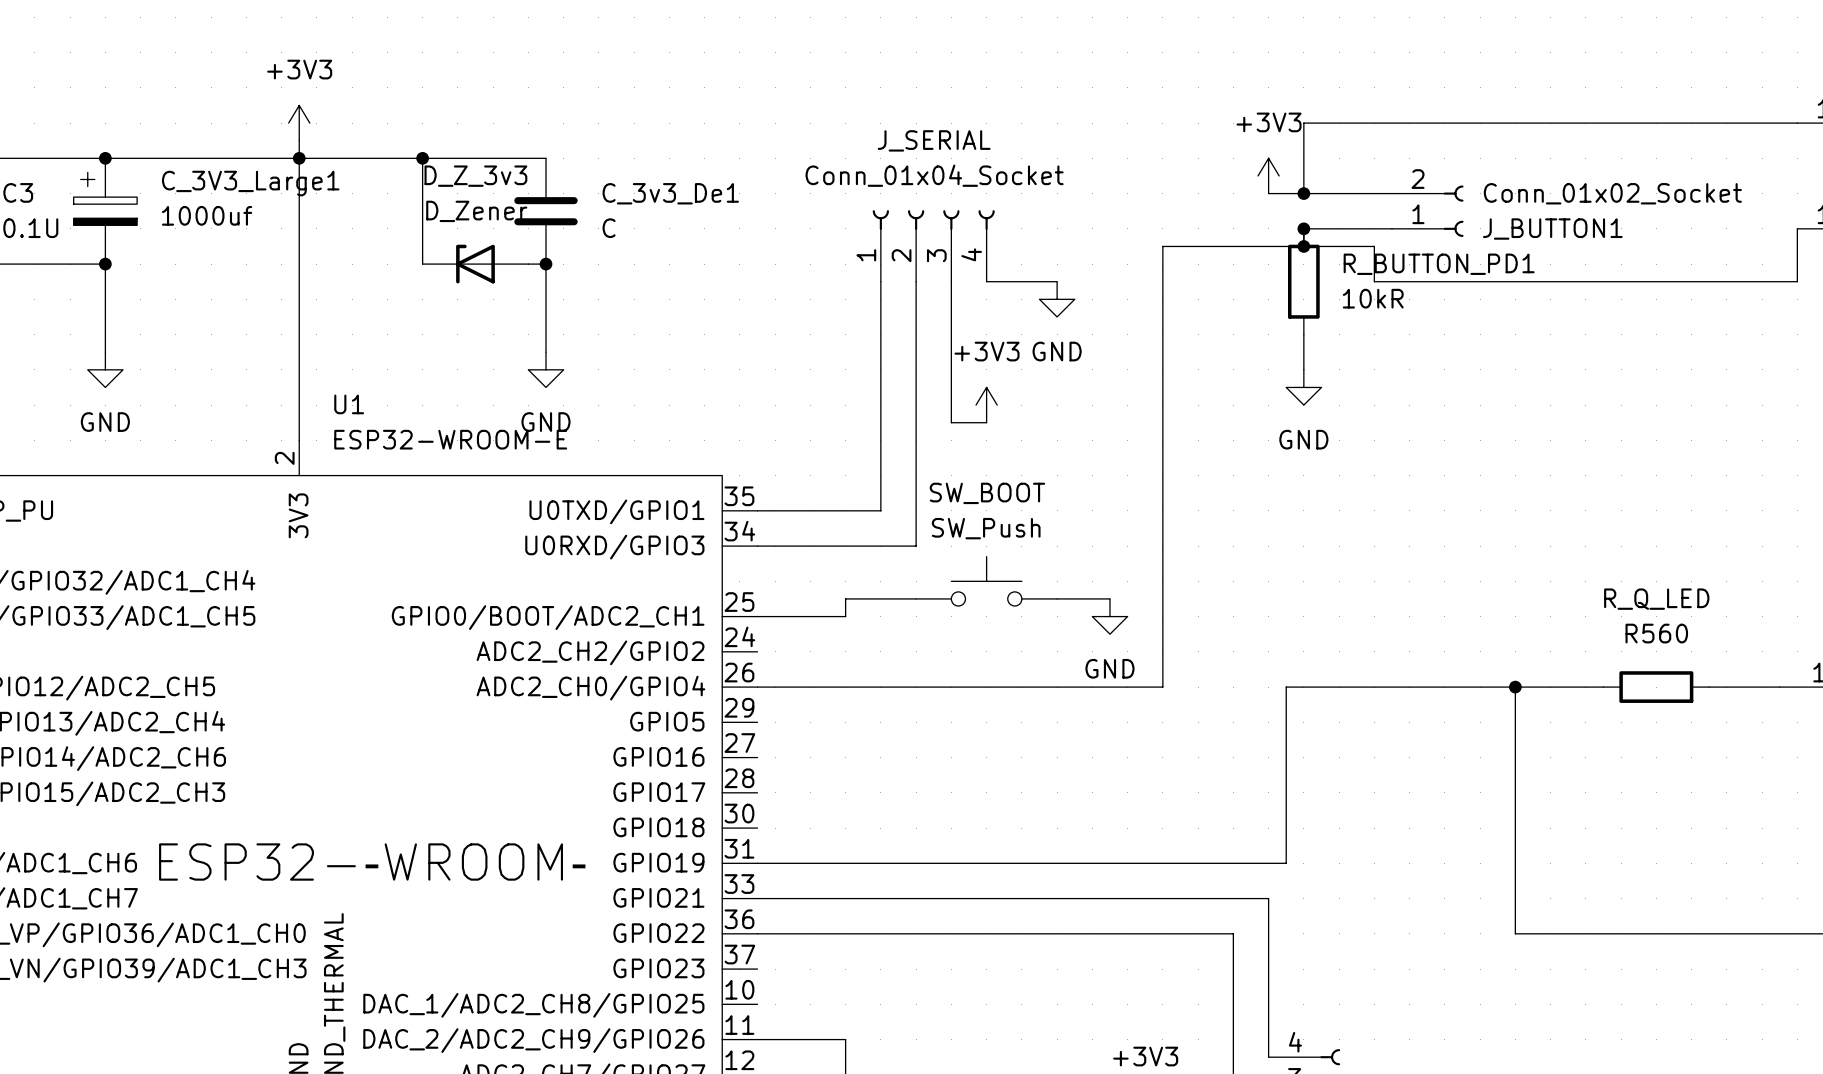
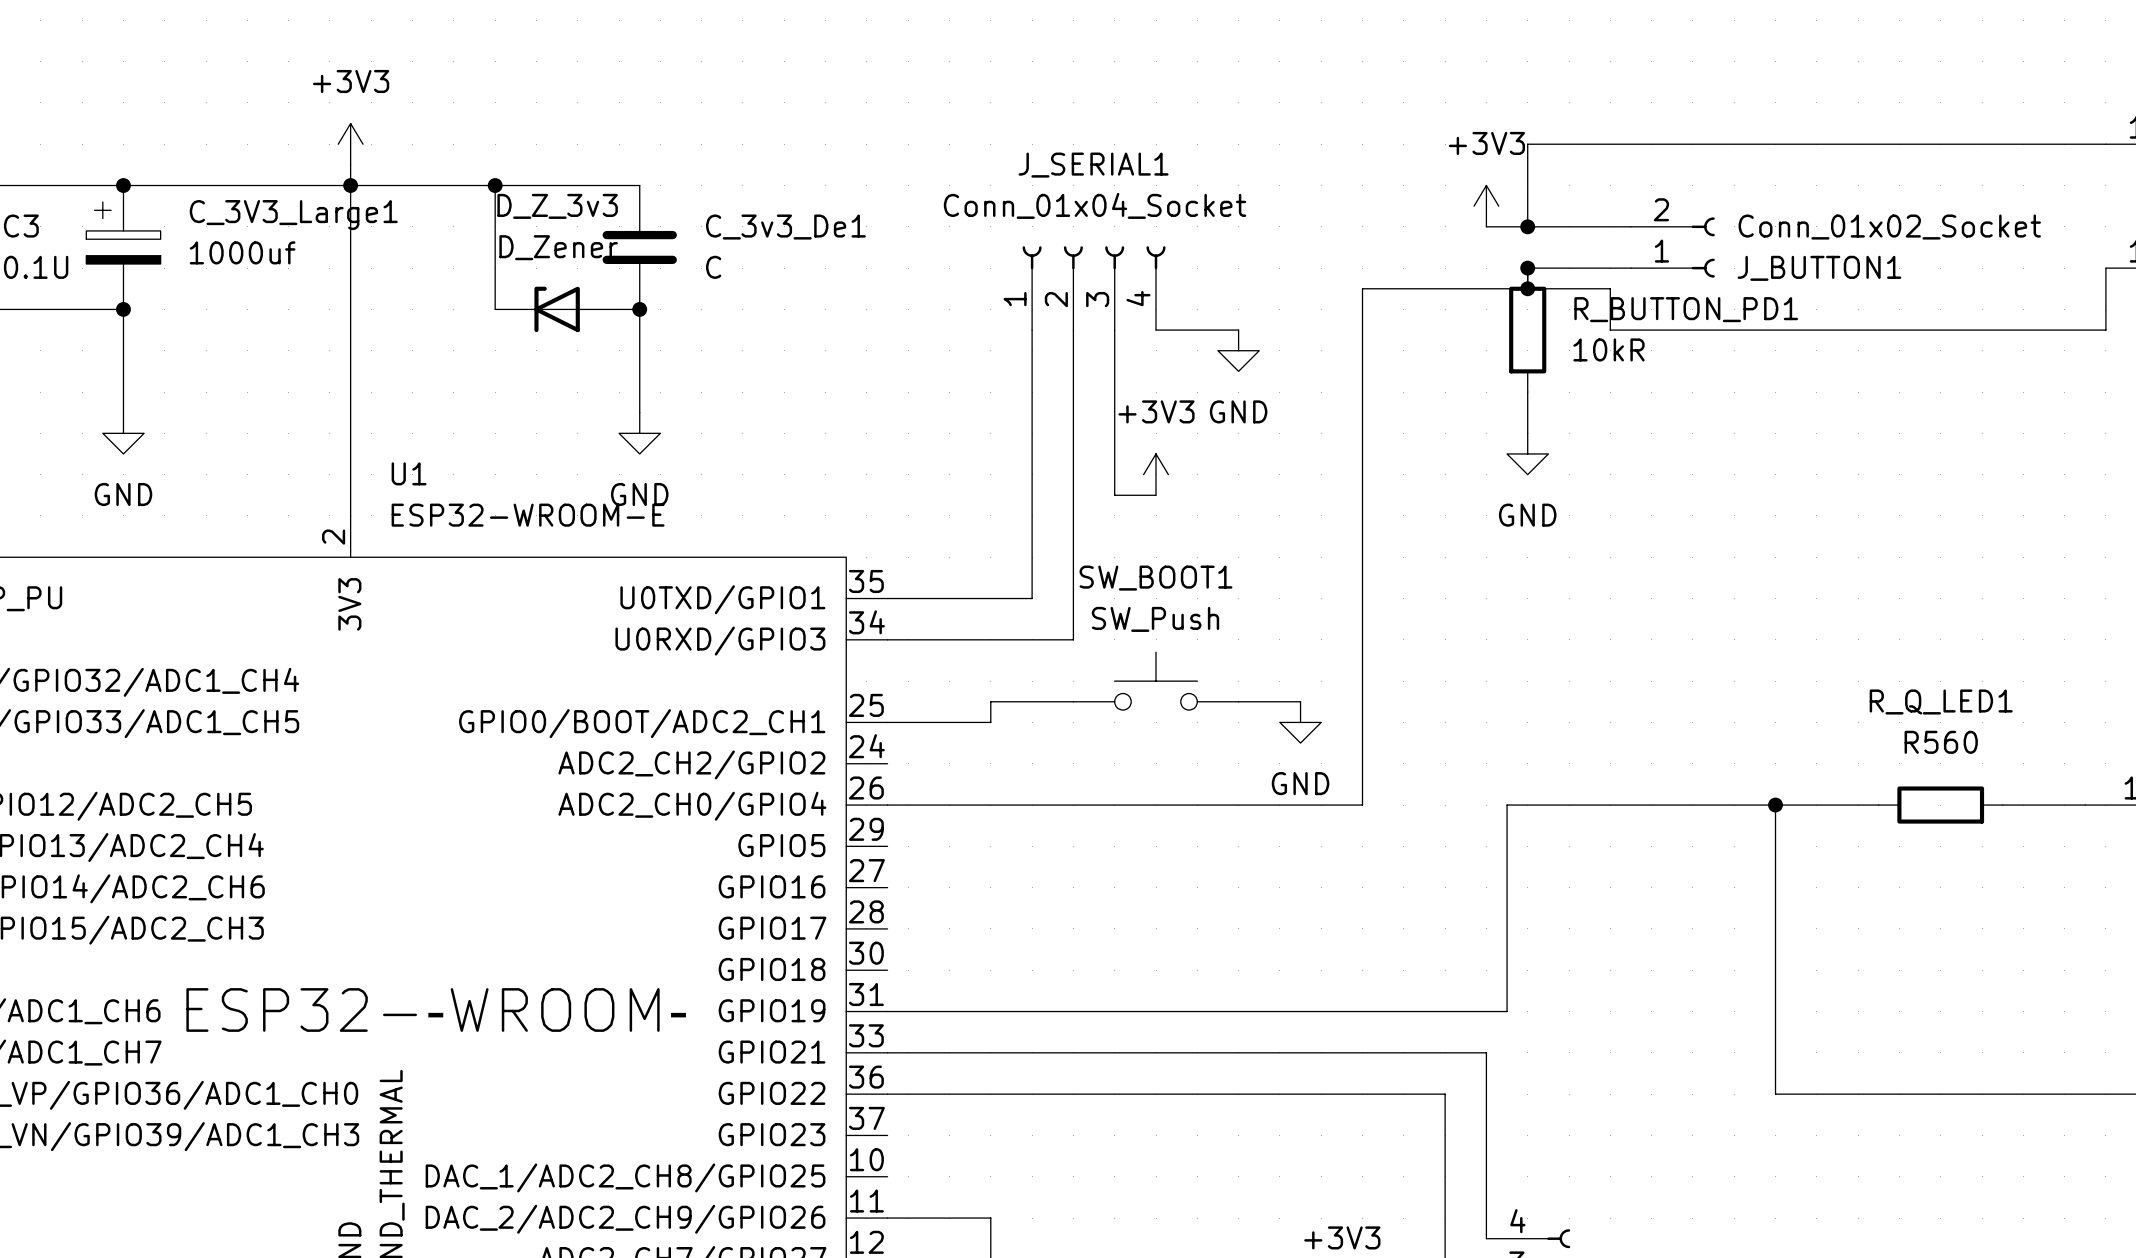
J_SERIAL name: J_SERIAL (934, 140) -> J_SERIAL1 (1093, 165)
SW_BOOT name: SW_BOOT (987, 493) -> SW_BOOT1 (1156, 578)
R_Q_LED name: R_Q_LED (1656, 599) -> R_Q_LED1 (1941, 701)

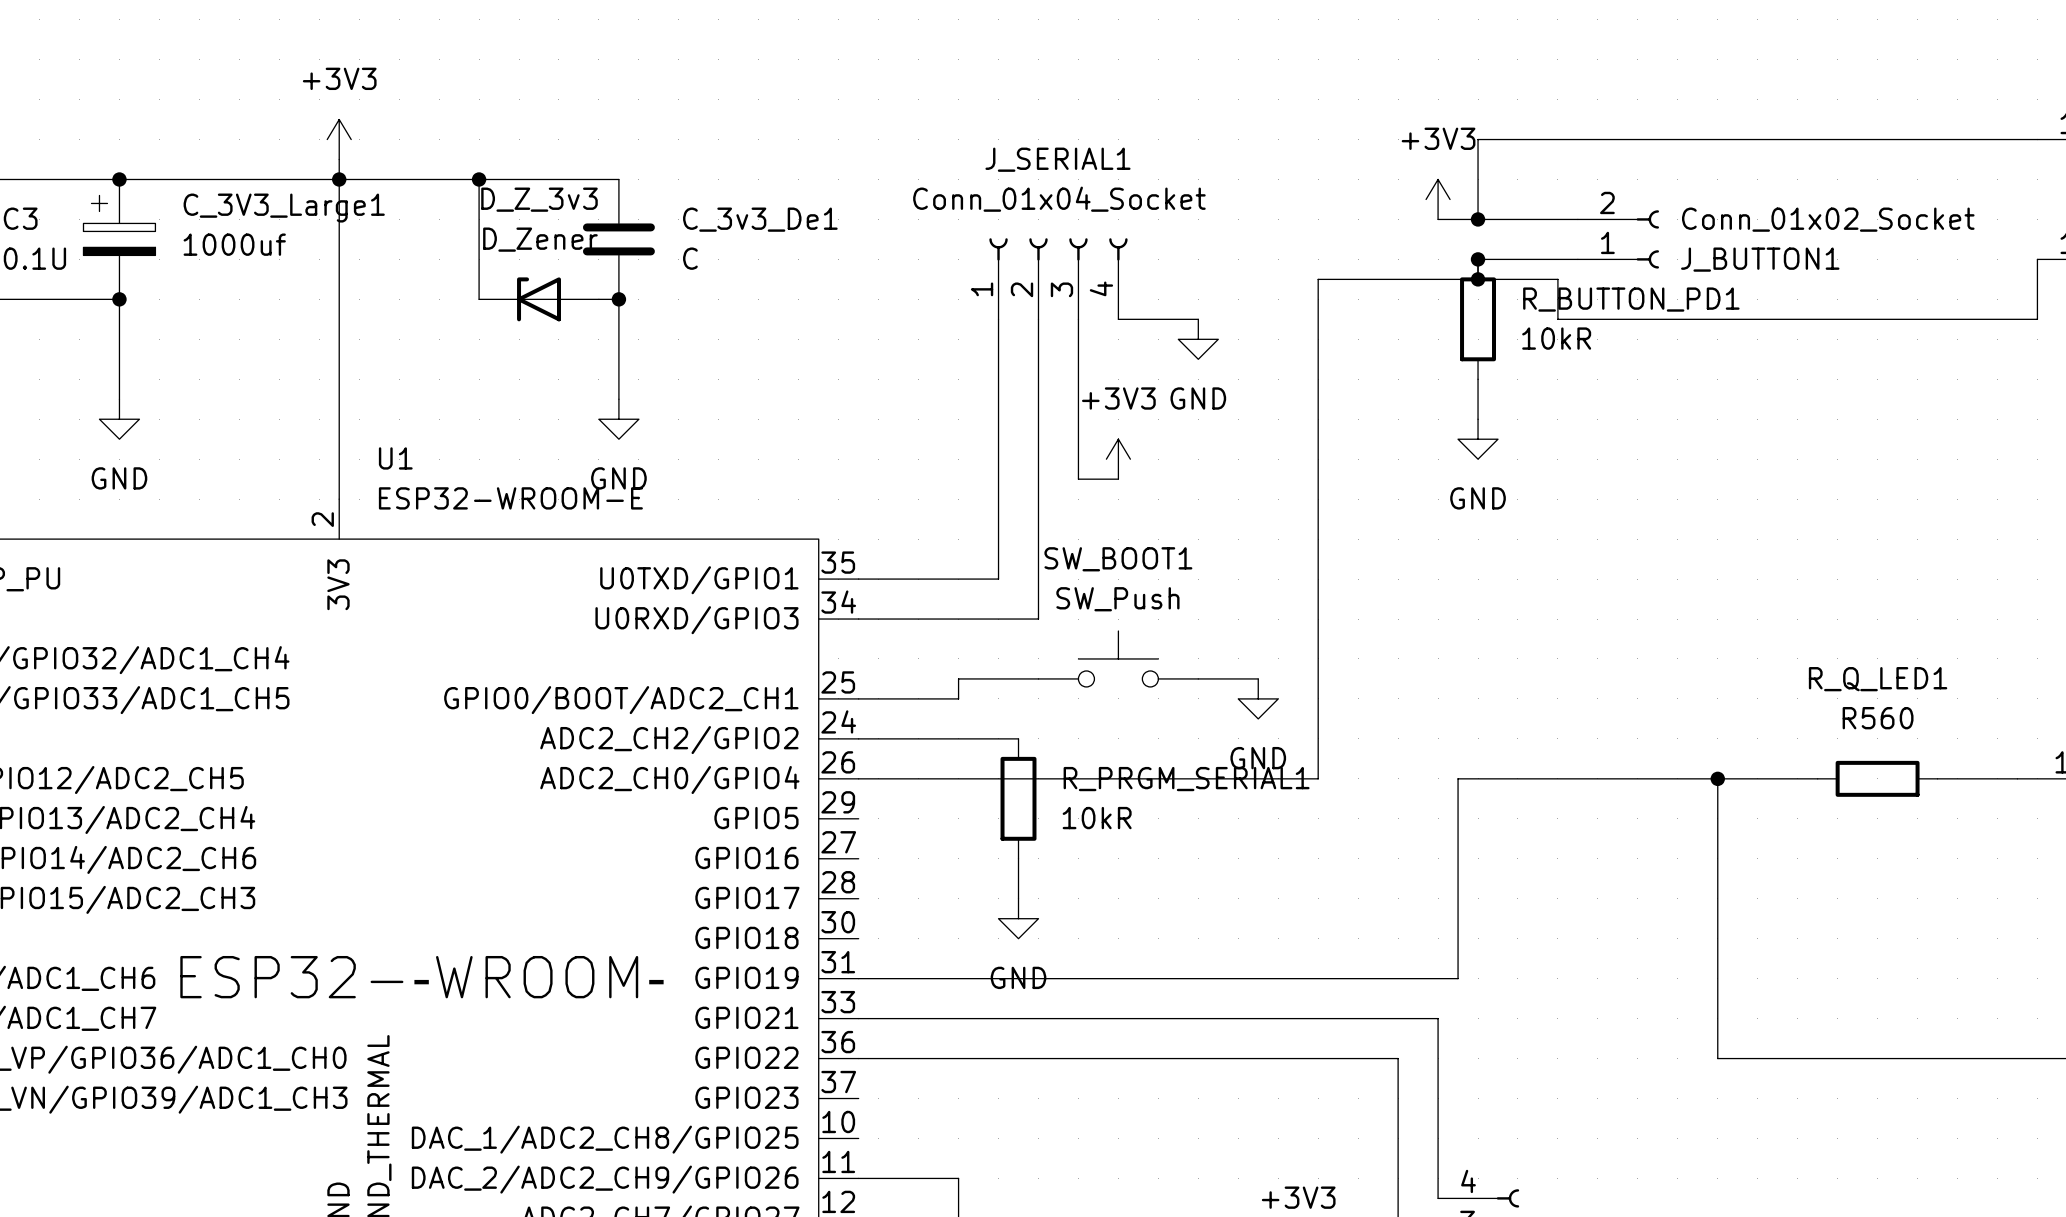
wire: none -> (858, 738) (1018, 738)
R_PRGM_SERIAL1: none -> 10kR (1018, 798)
wire: none -> (1018, 858) (1018, 898)
power symbol: none -> GND (1018, 918)

